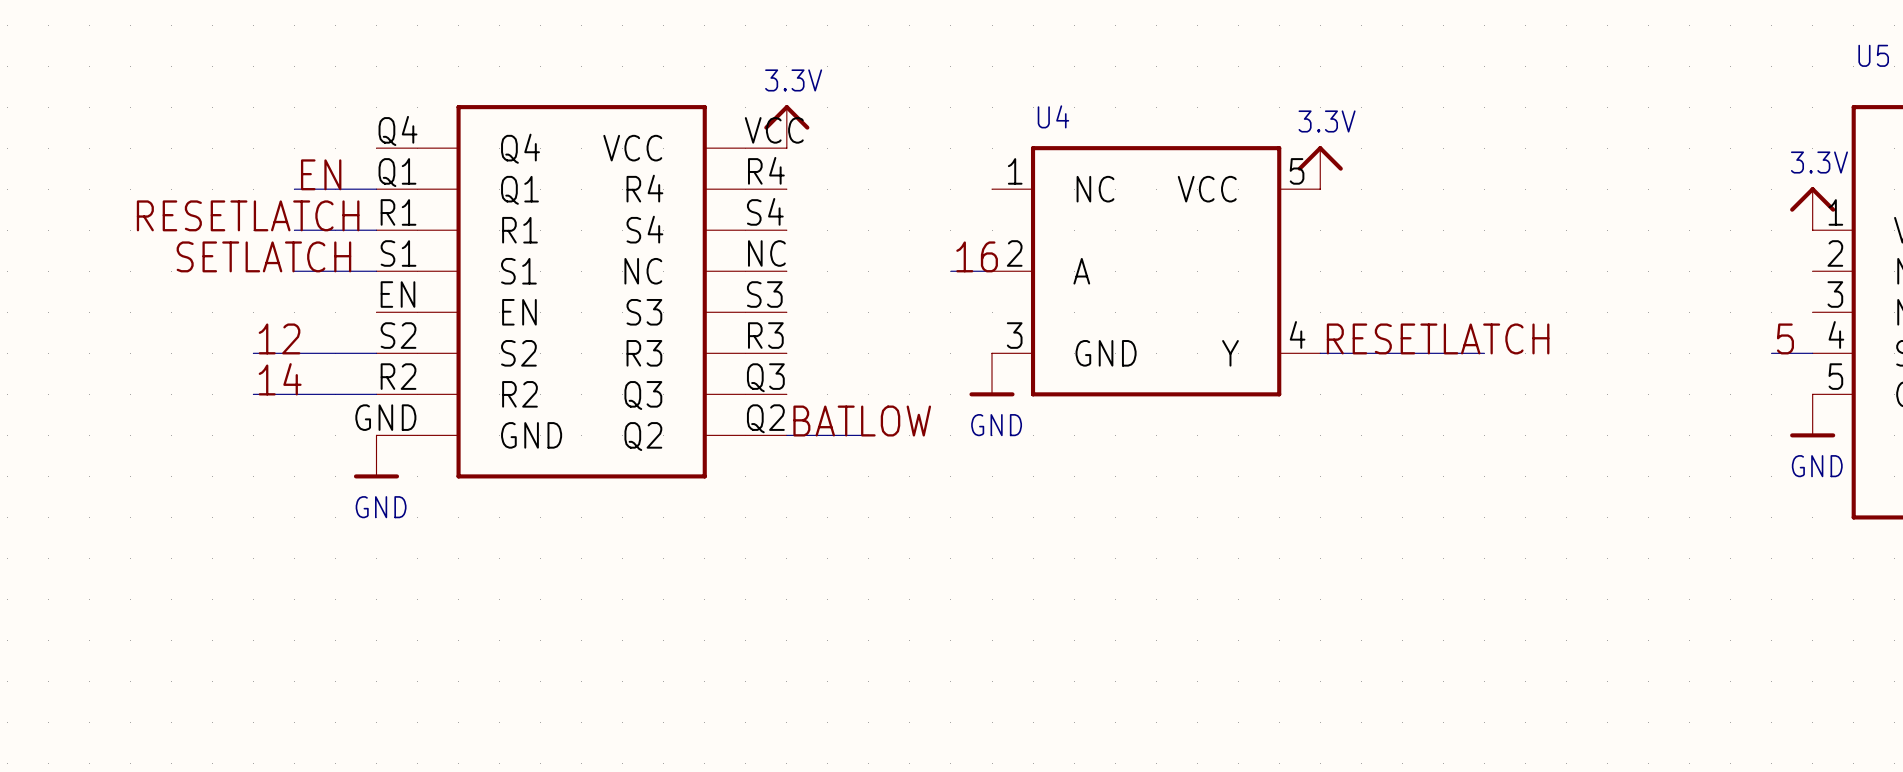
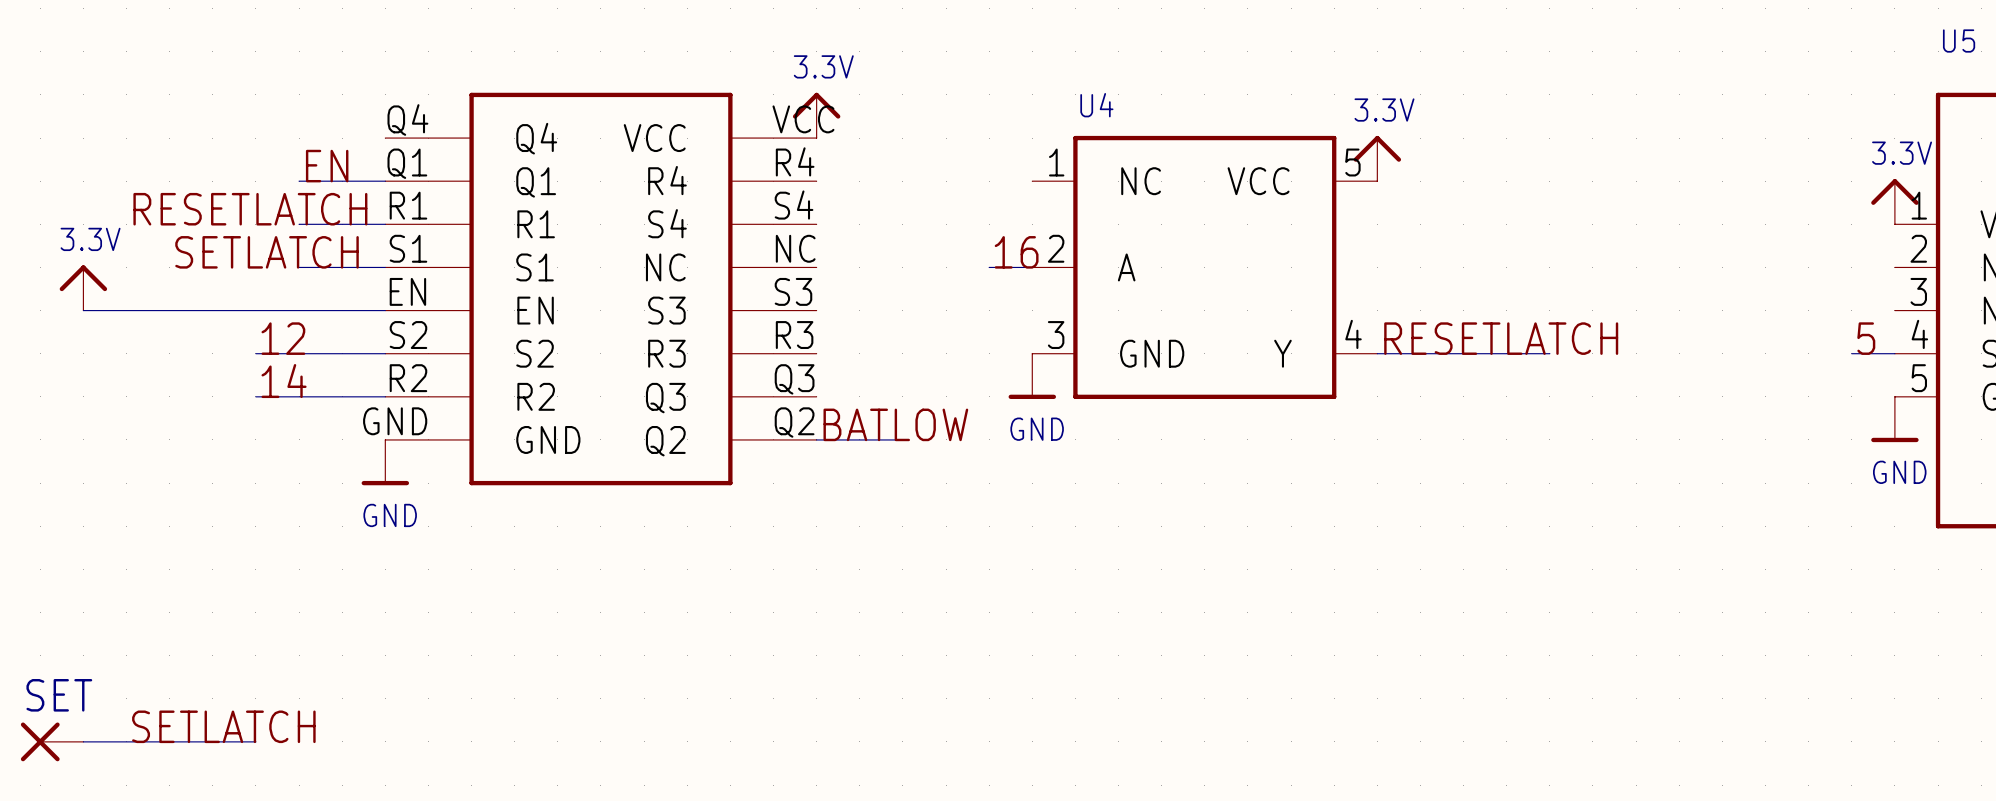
power symbol: none -> 3.3V (83, 287)
wire: none -> (83, 310) (385, 310)
label: none -> SETLATCH (223, 726)
SET: none -> (52, 741)
wire: none -> (83, 741) (255, 741)

